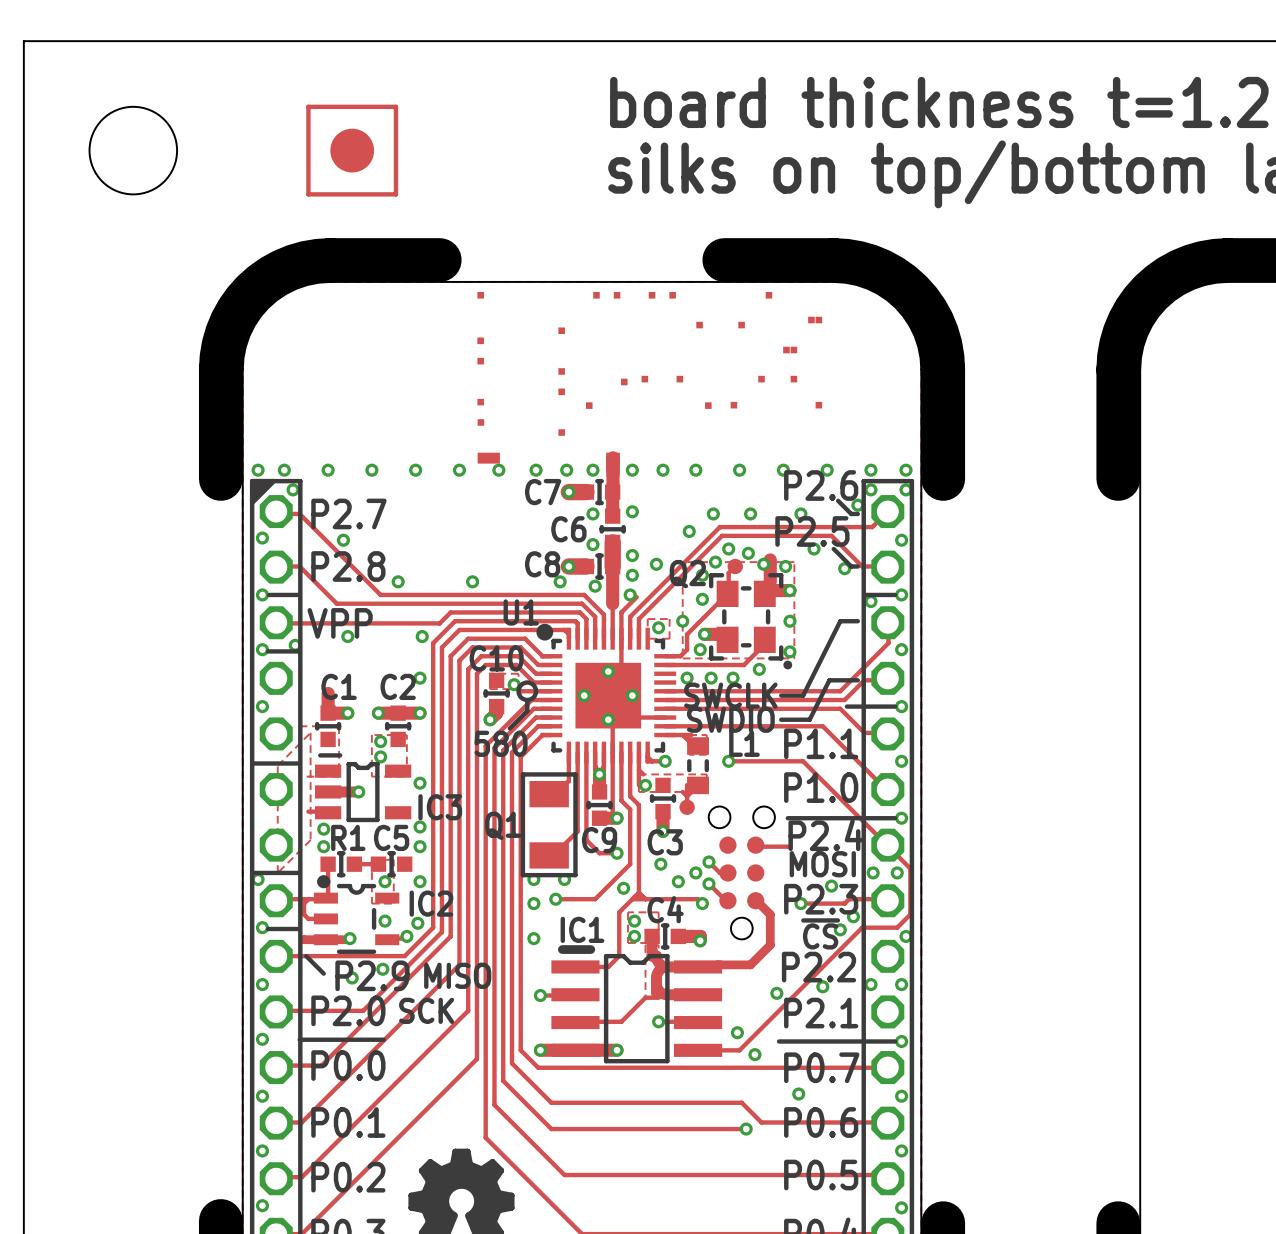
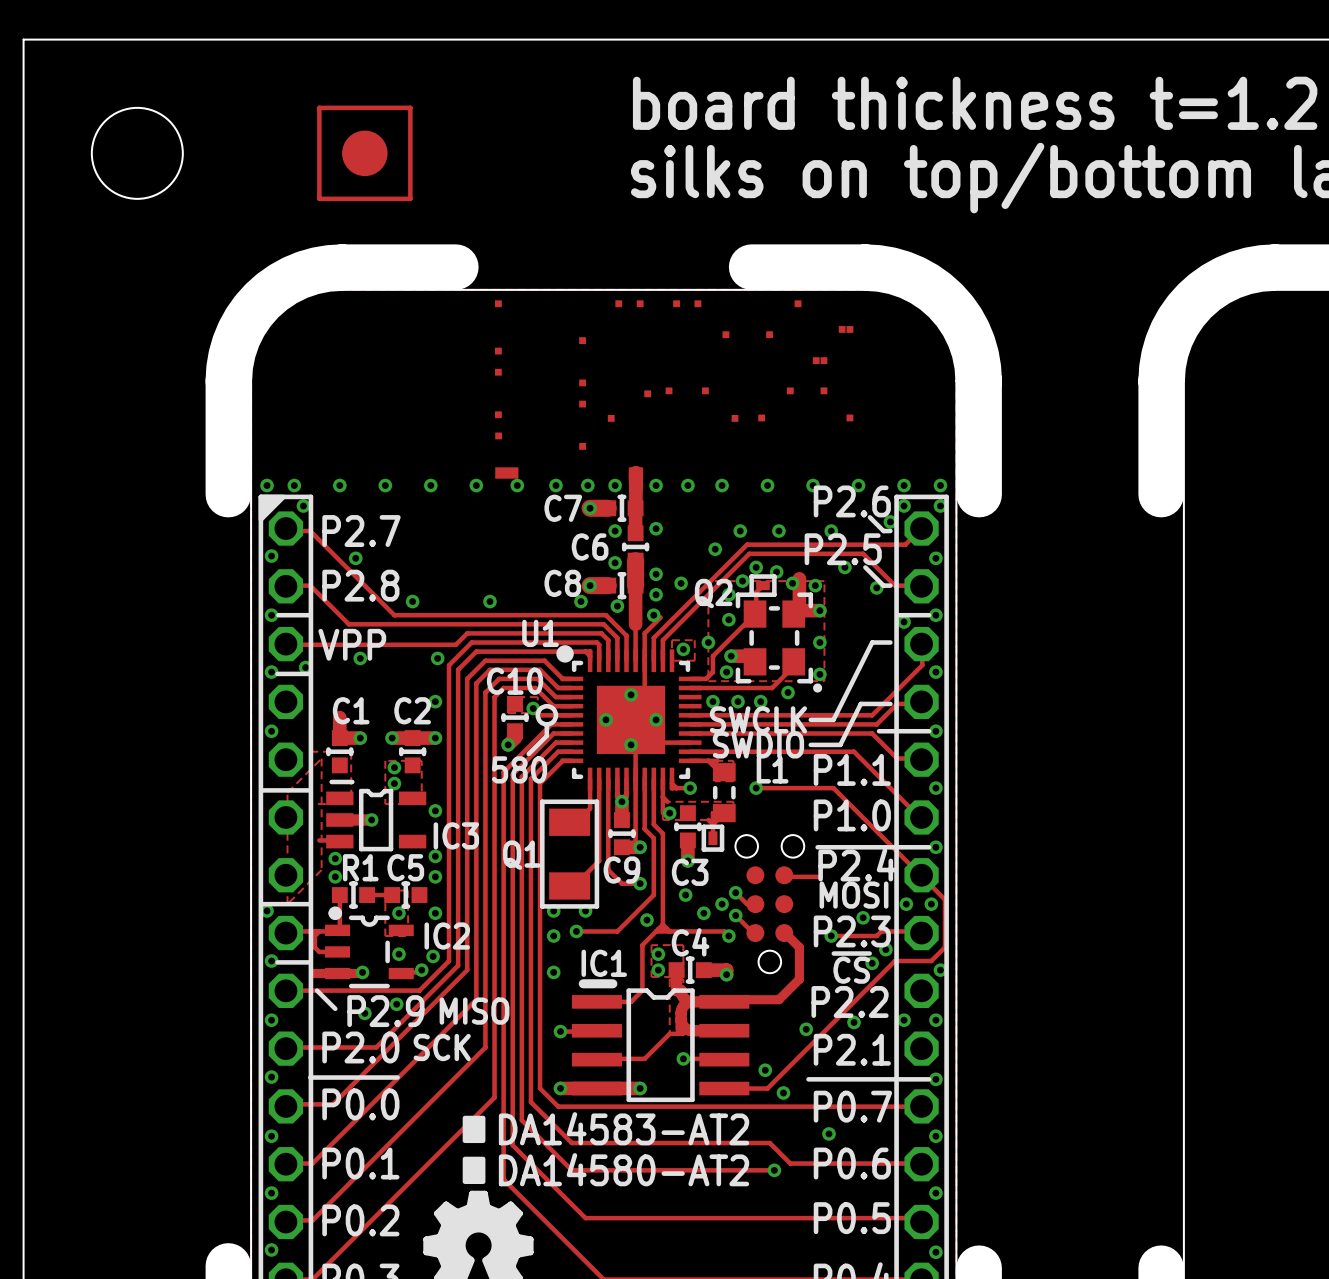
part footprint: [727, 558, 743, 575] -> [749, 574, 777, 598]
part footprint: [679, 799, 695, 815] -> [701, 824, 725, 852]
drawing: none -> [462, 1115, 486, 1185]
text: none -> DA14583-AT2 (624, 1128)
text: none -> DA14580-AT2 (624, 1169)

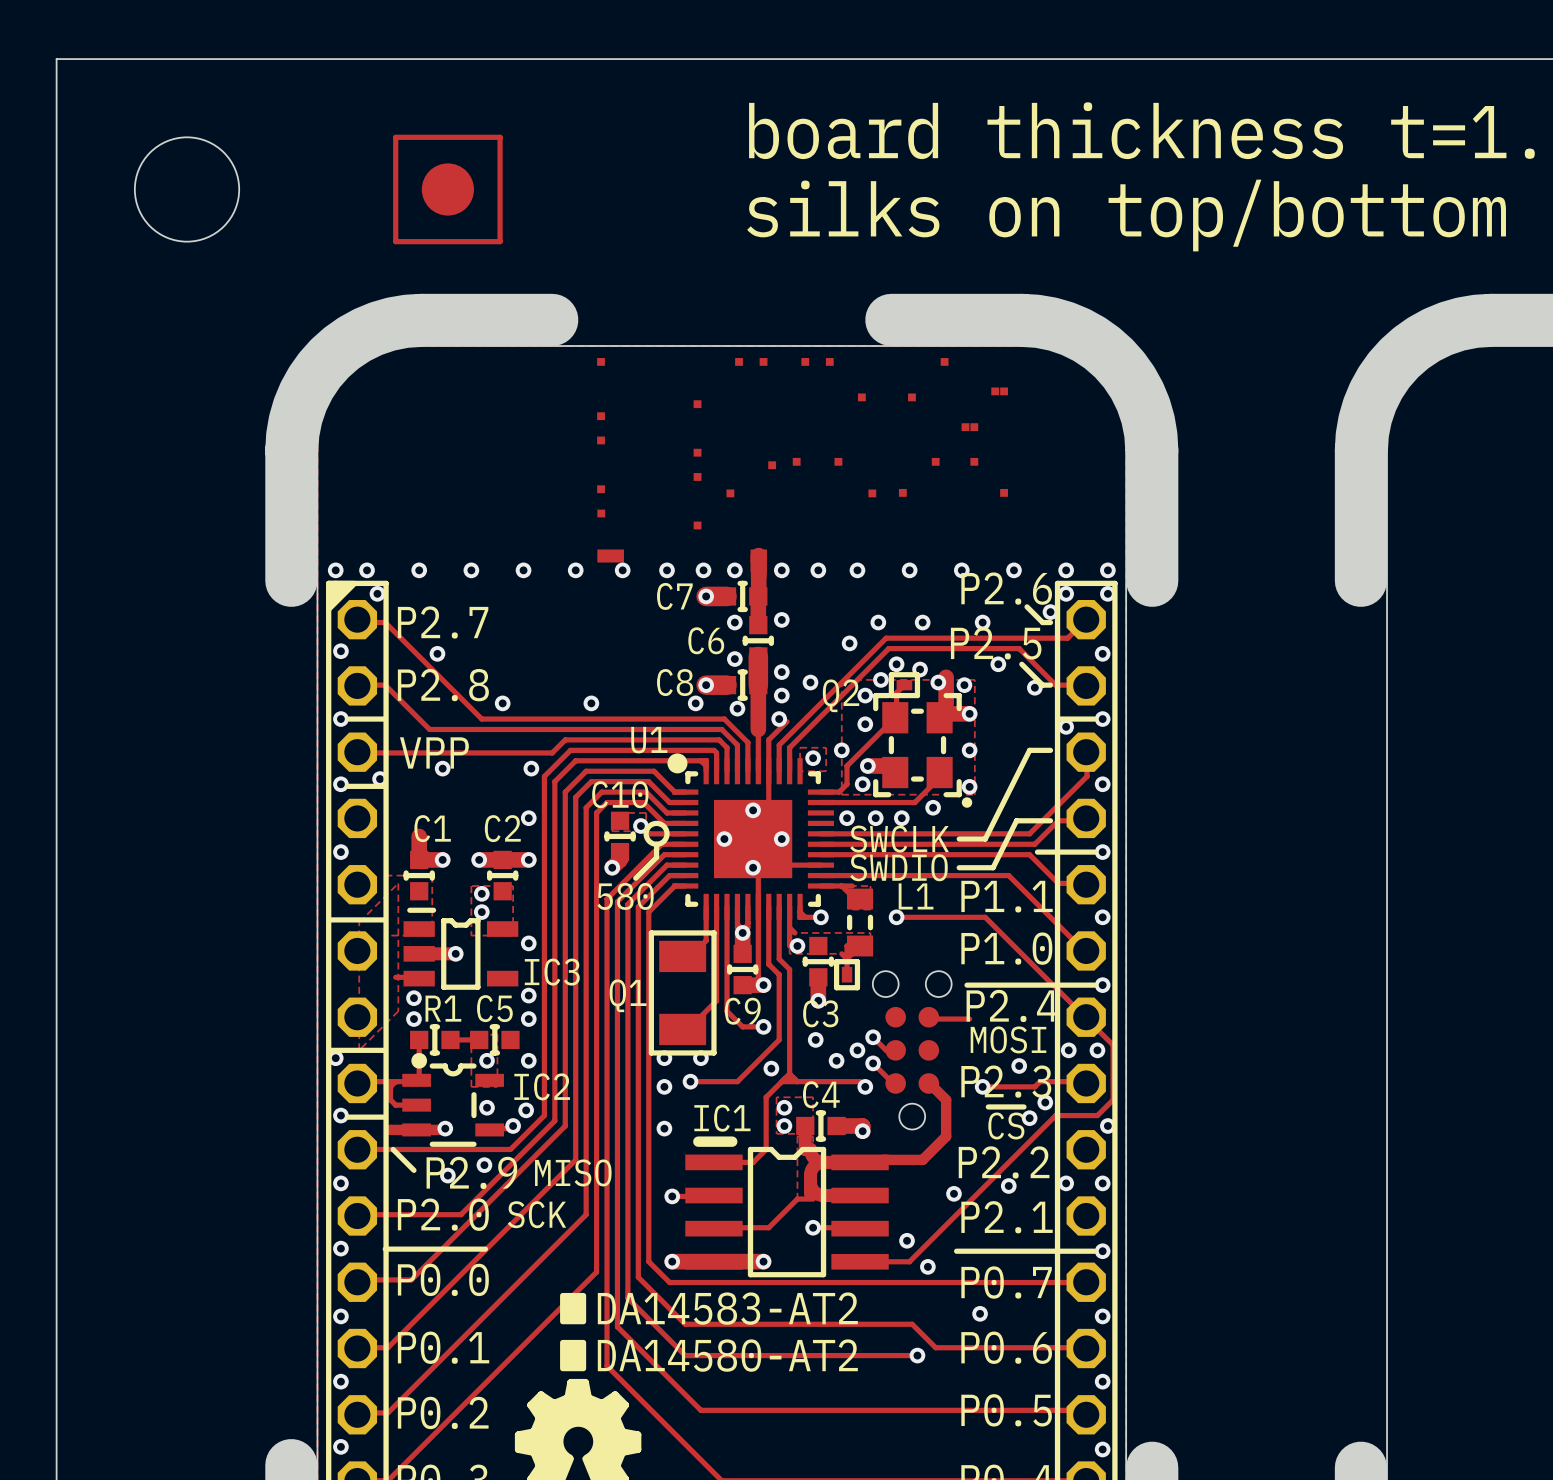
IC2 footprint: [325, 906, 414, 989] -> [402, 1052, 504, 1147]

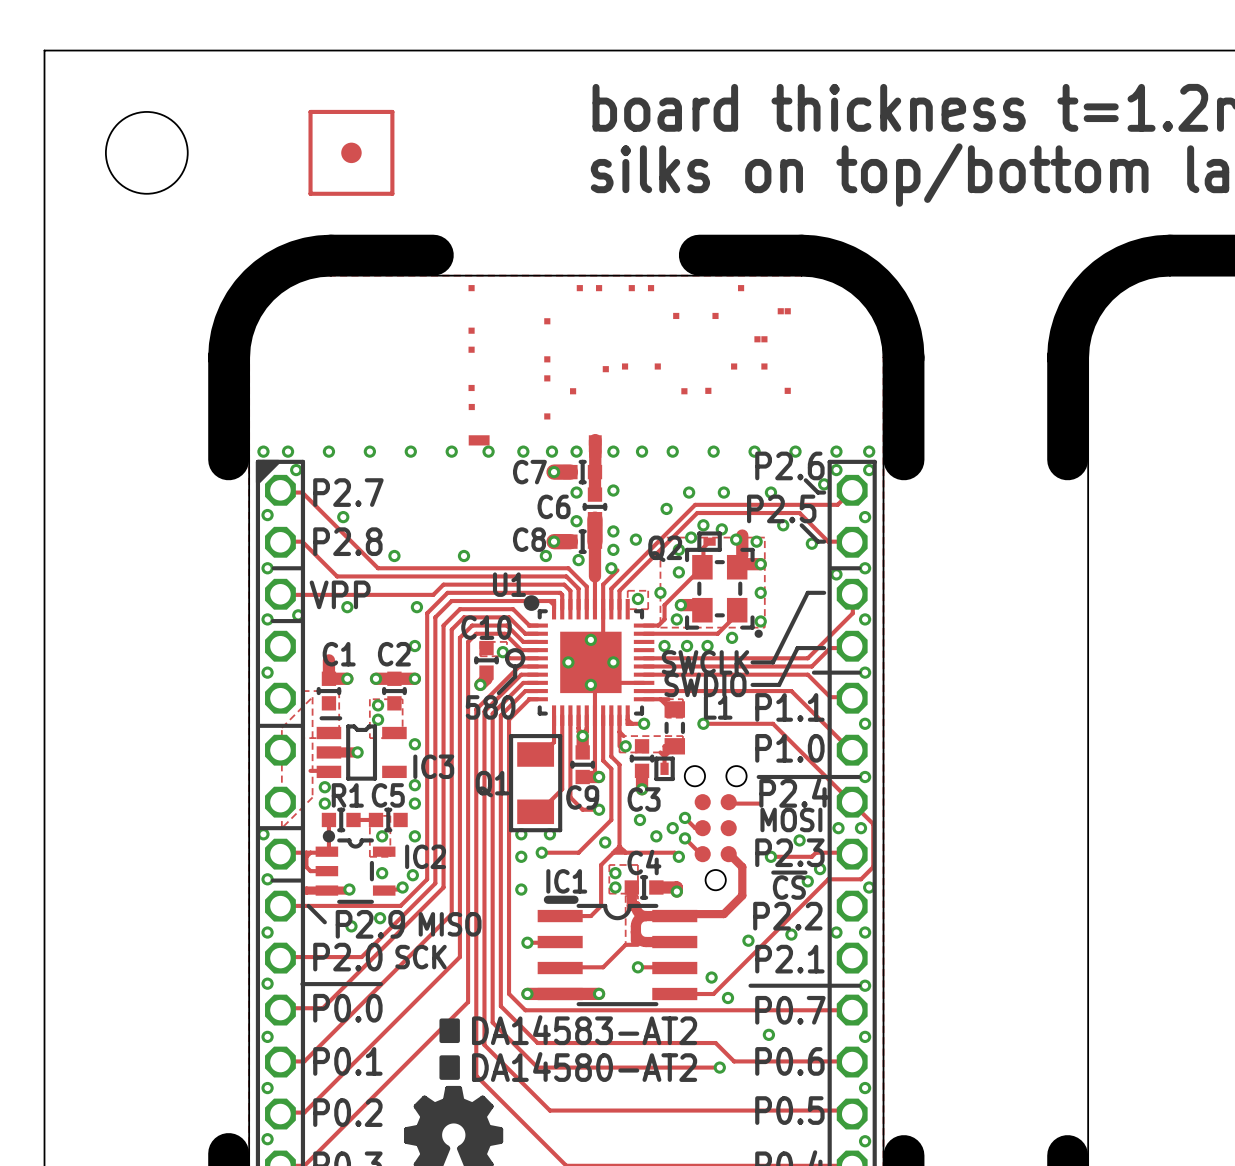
part footprint: [393, 134, 503, 245] -> [308, 109, 395, 196]
IC1 footprint: [685, 1136, 889, 1278] -> [537, 895, 698, 1007]

